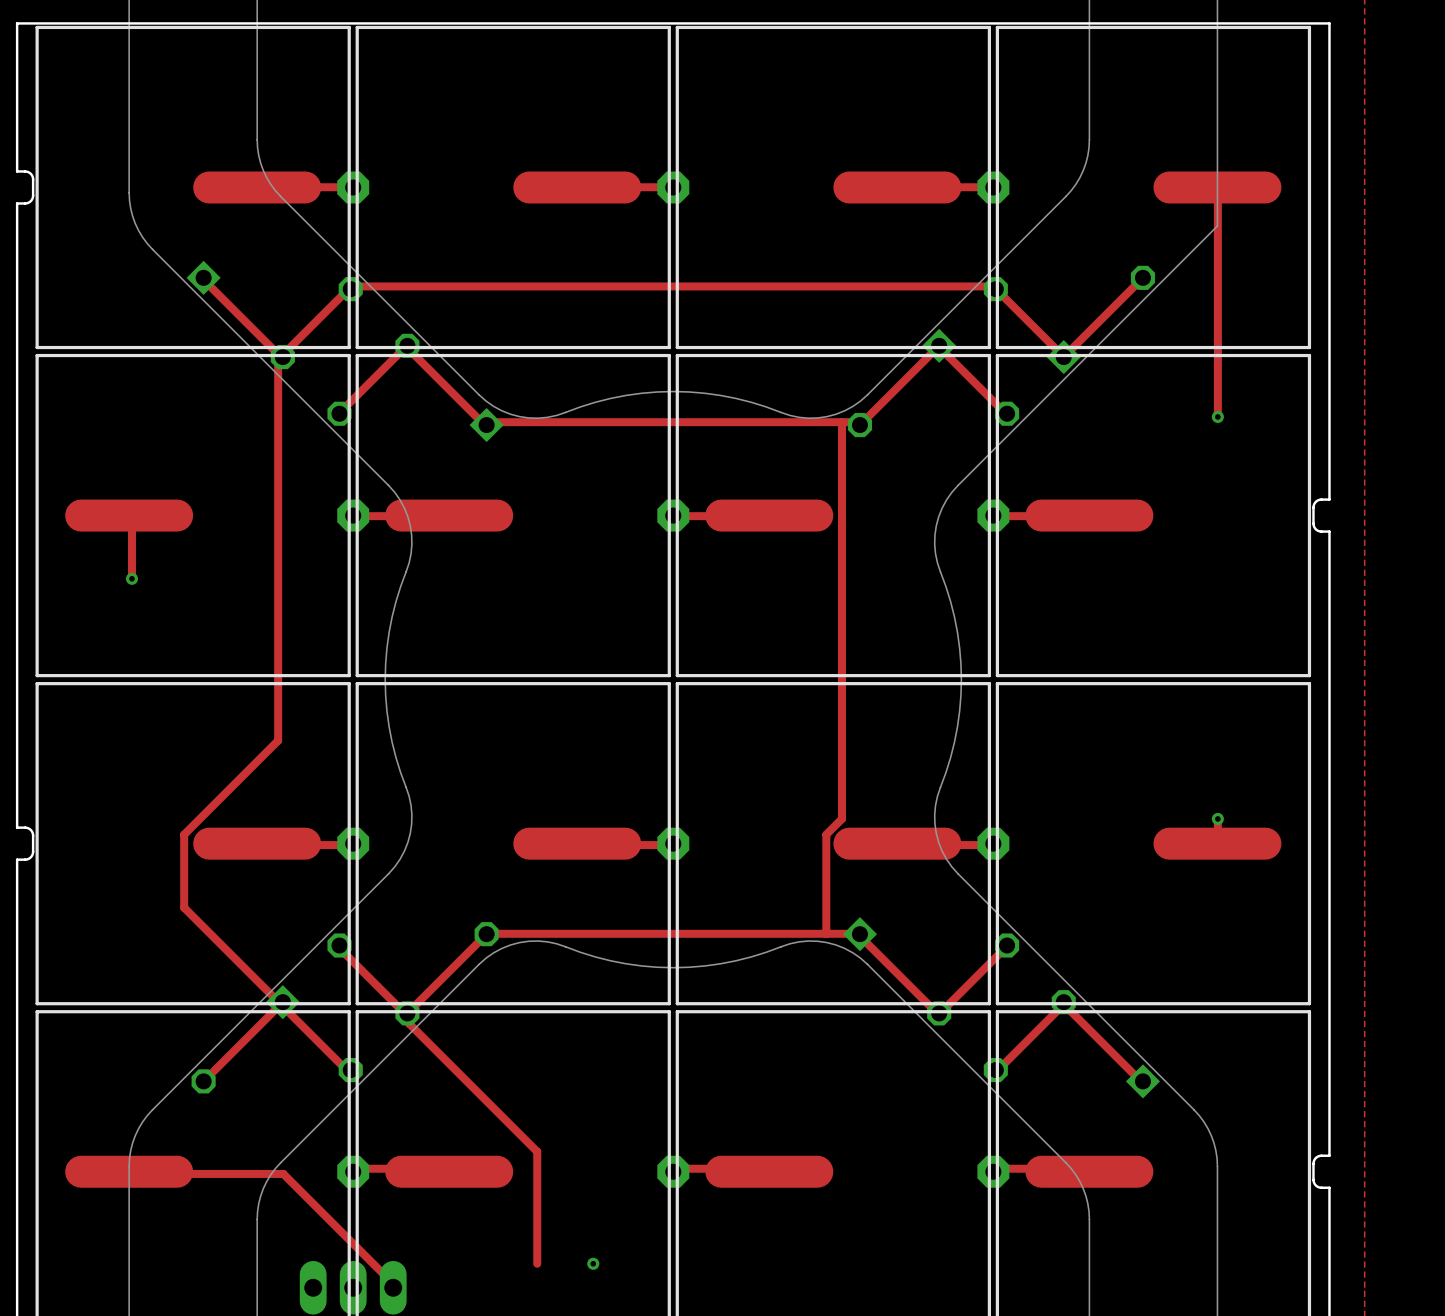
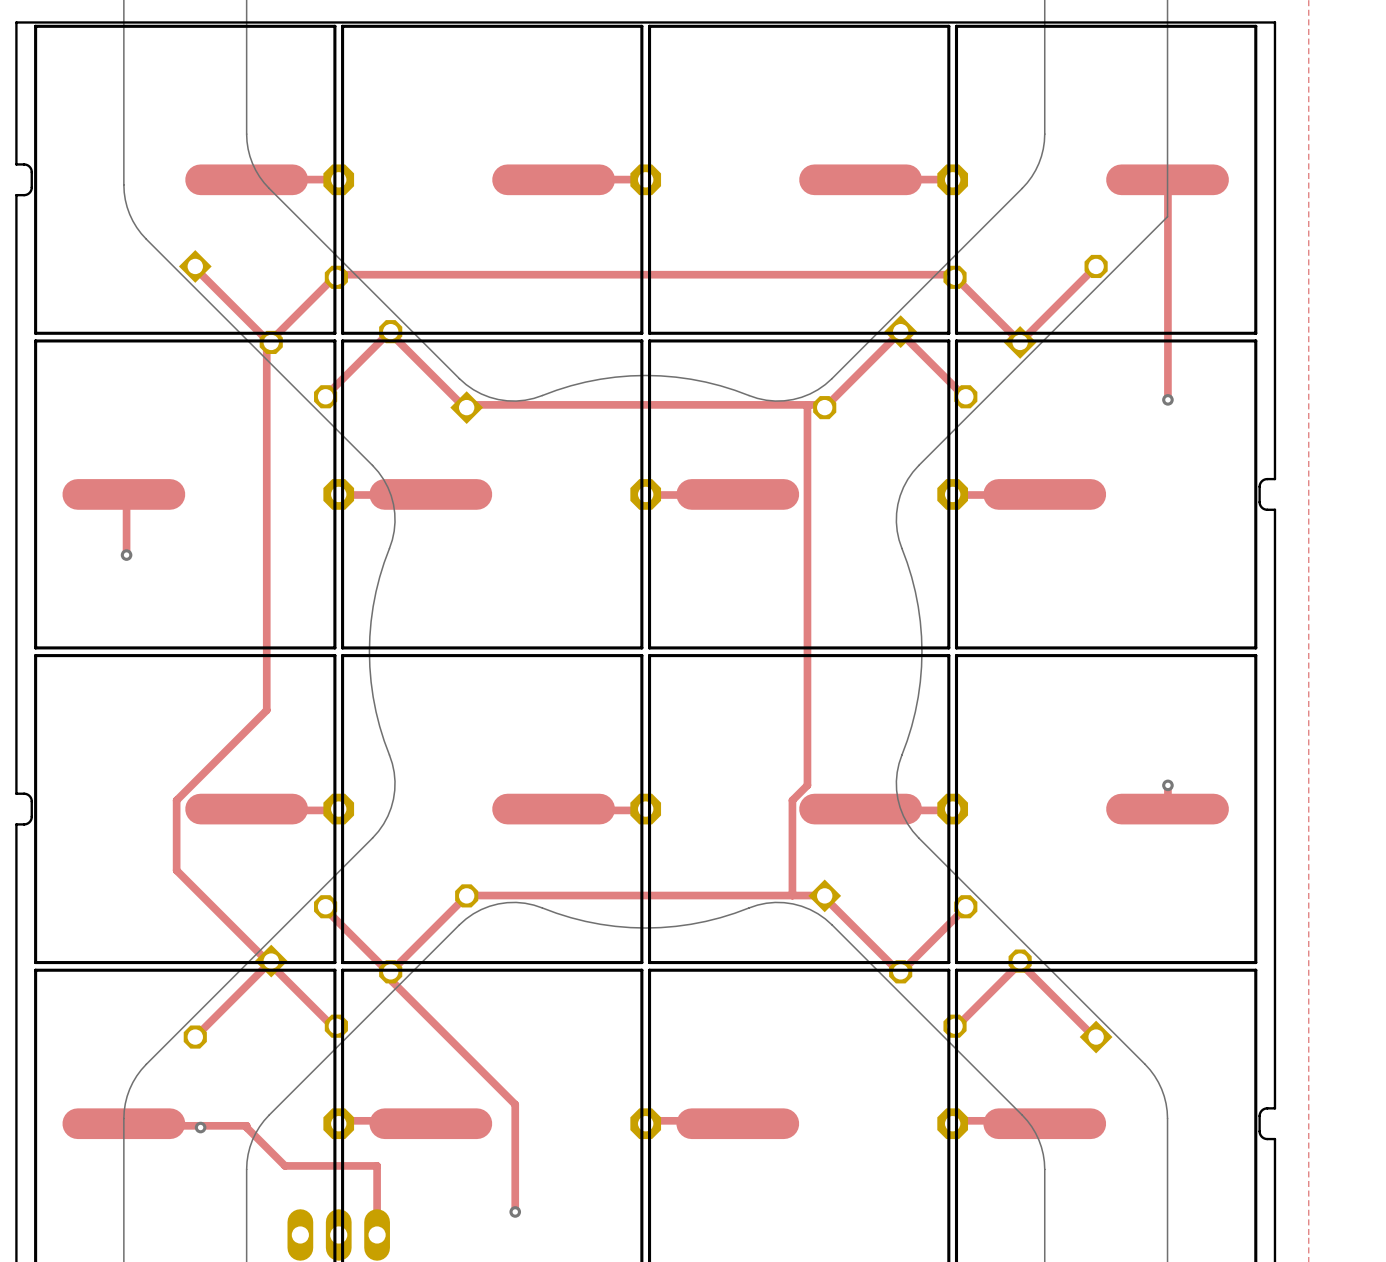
track: (257, 1173) (283, 1173) (393, 1283) (393, 1287) -> (246, 1125) (285, 1165) (377, 1165) (377, 1234)
via: none -> (200, 1127)
via position: (593, 1263) -> (515, 1211)

